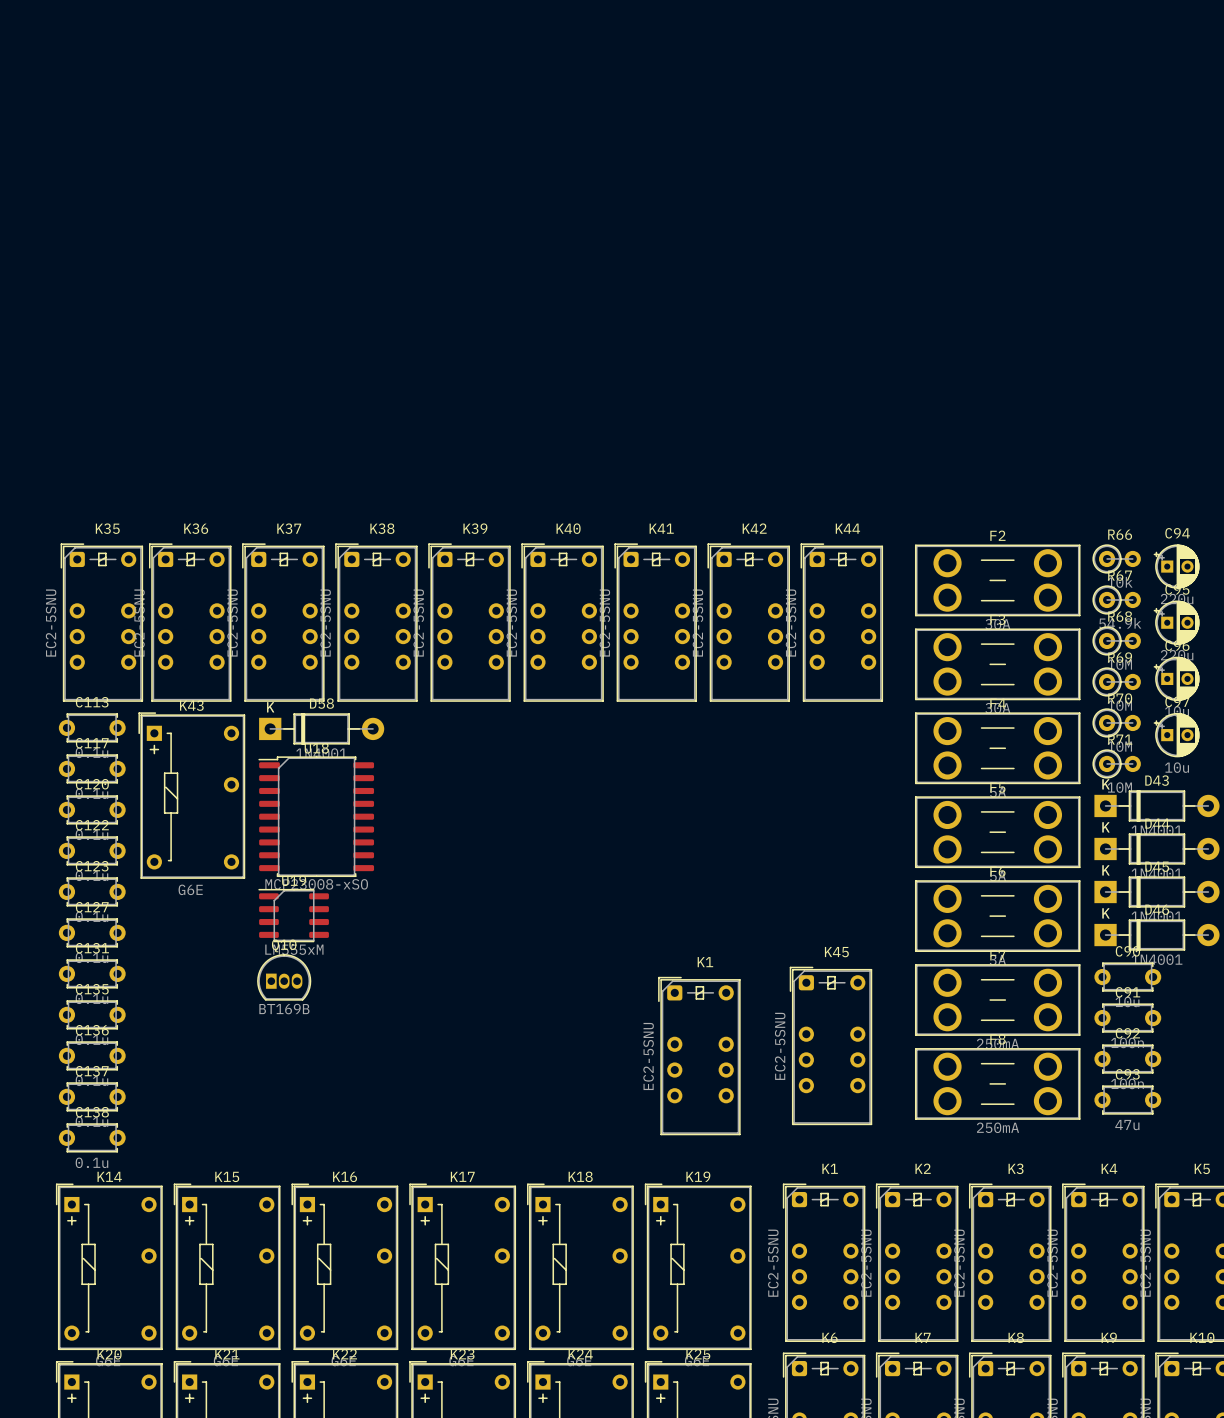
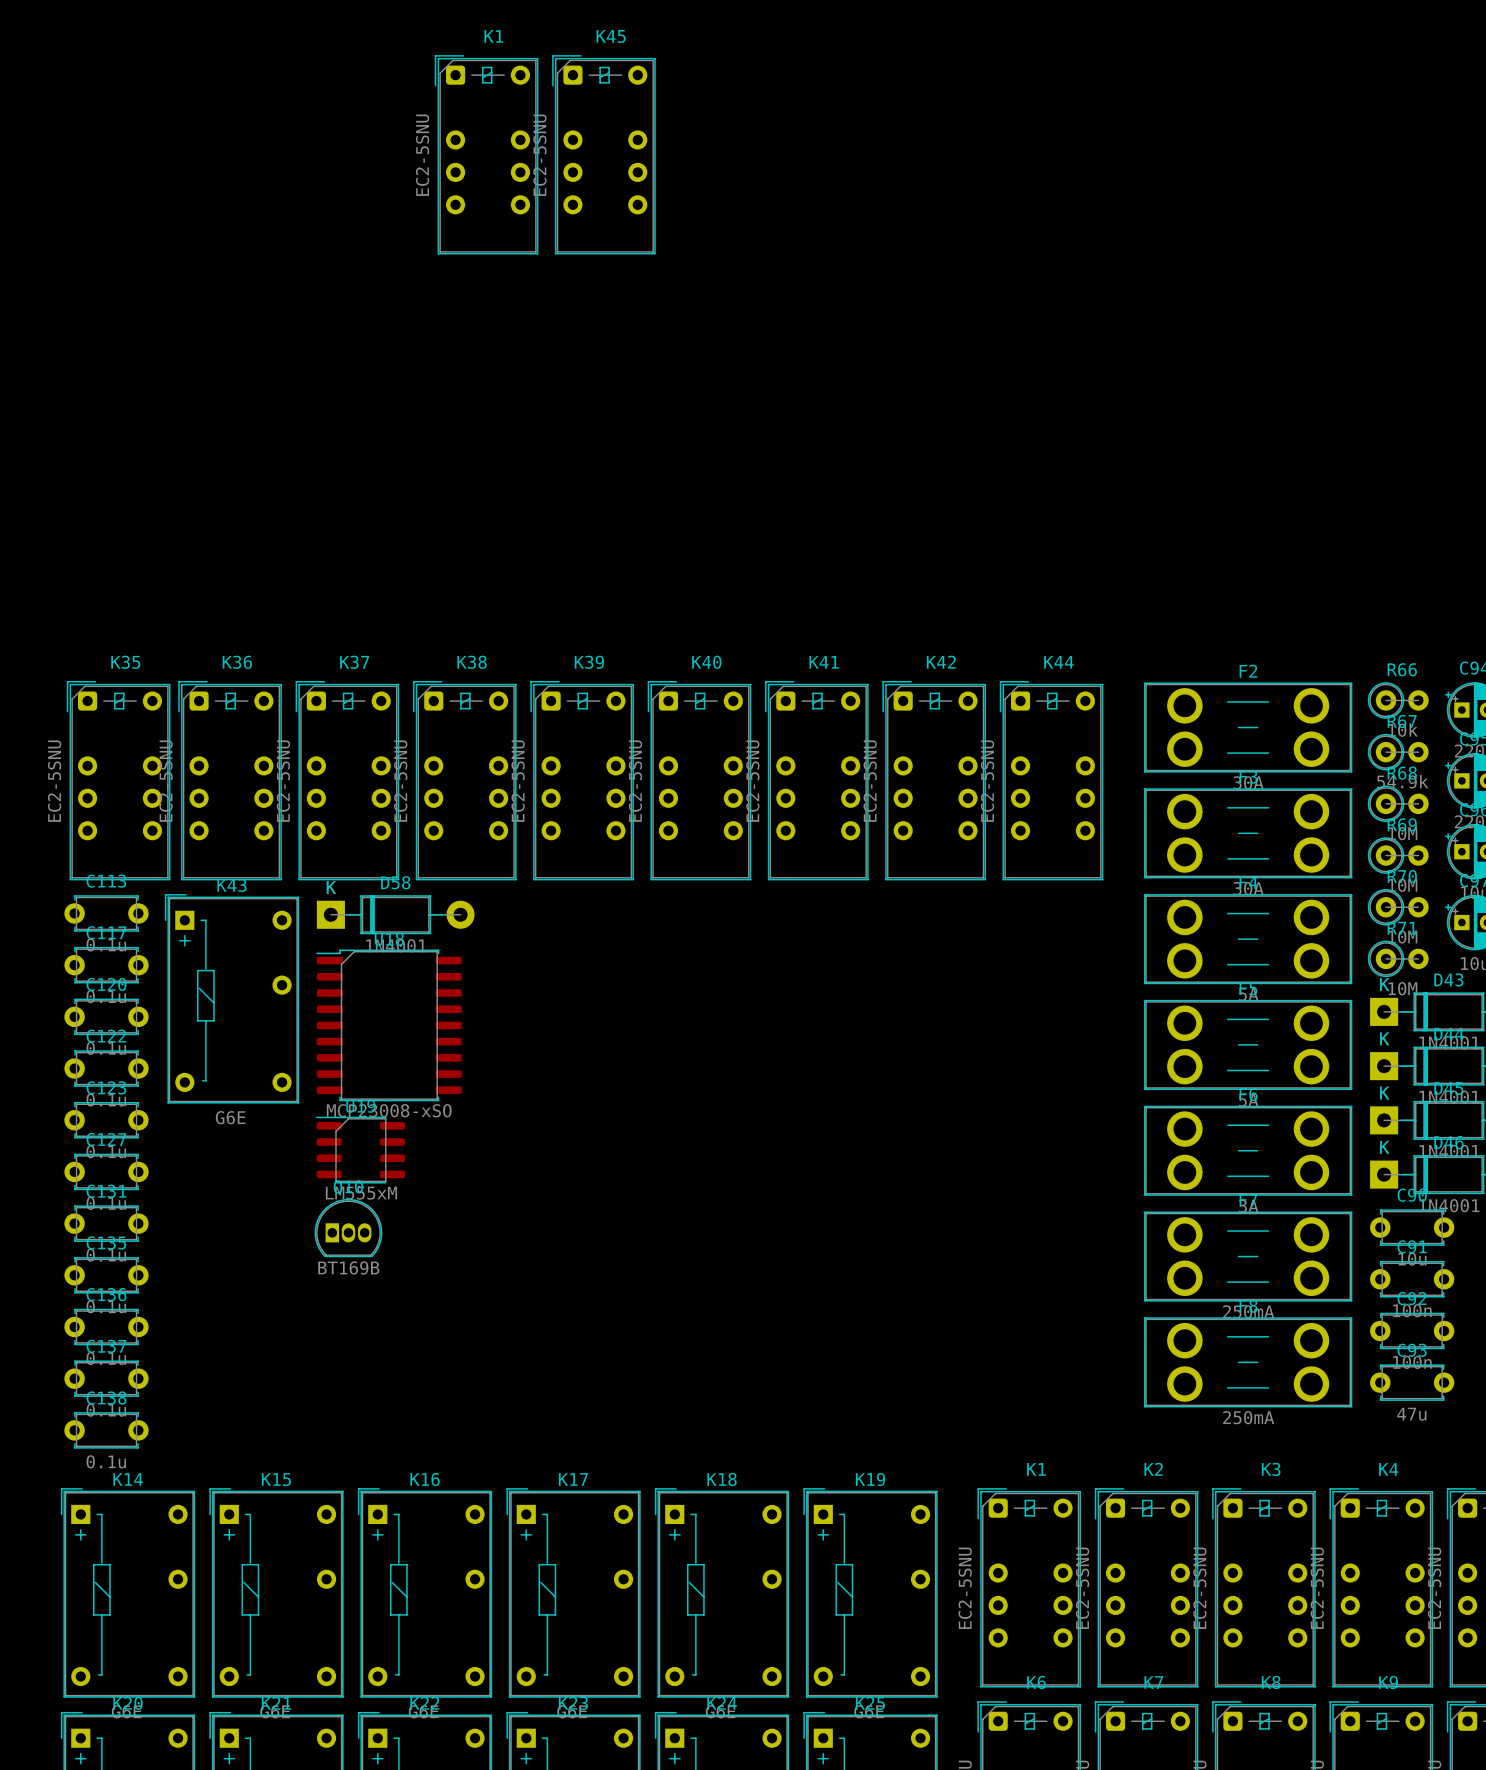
K1: none -> EC2-5SNU (486, 154)
K45 position: (830, 1045) -> (603, 154)
K1: EC2-5SNU (699, 1056) -> none

